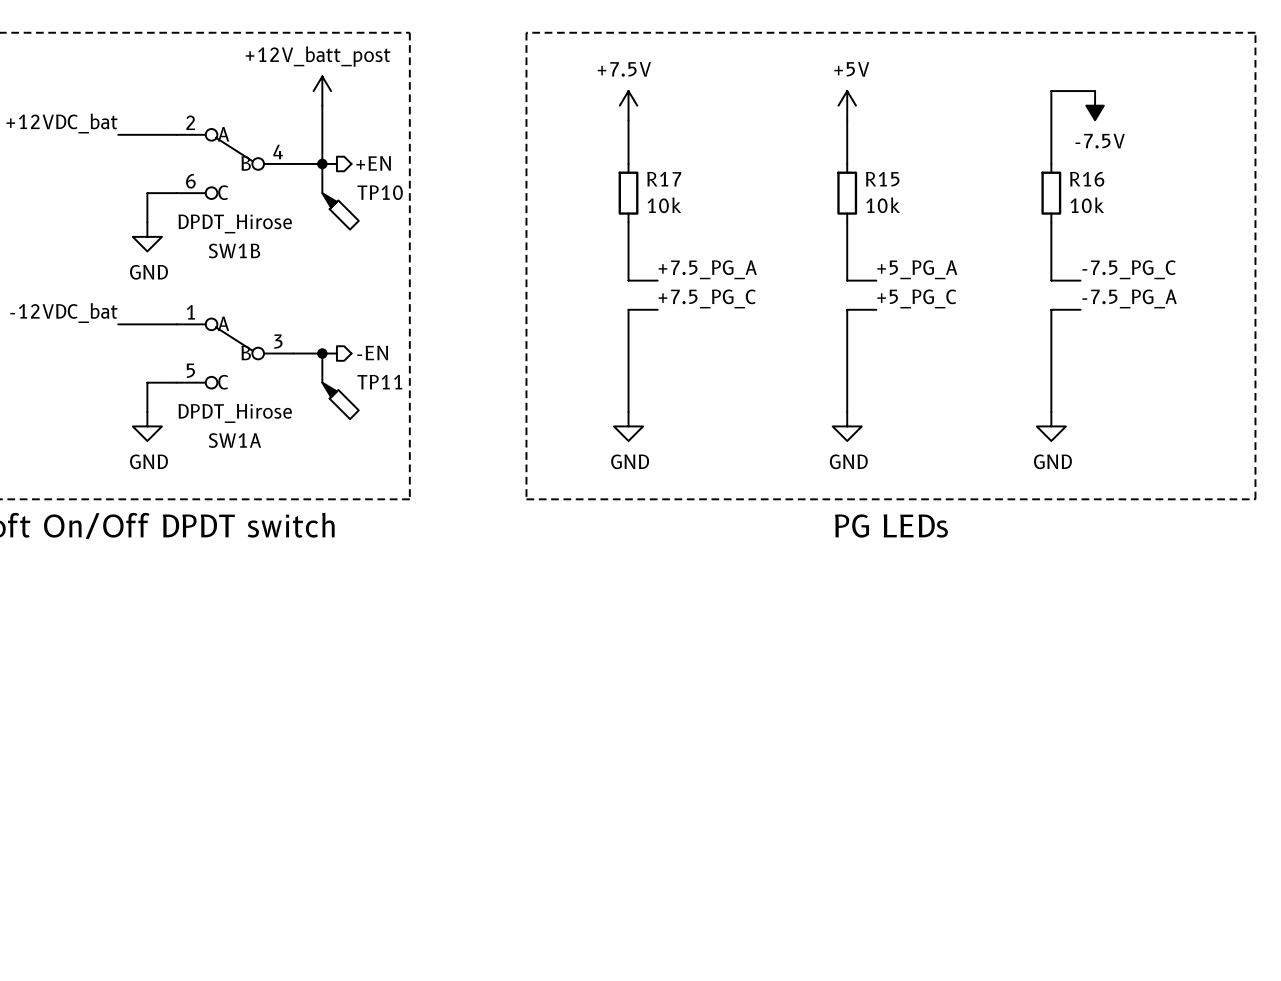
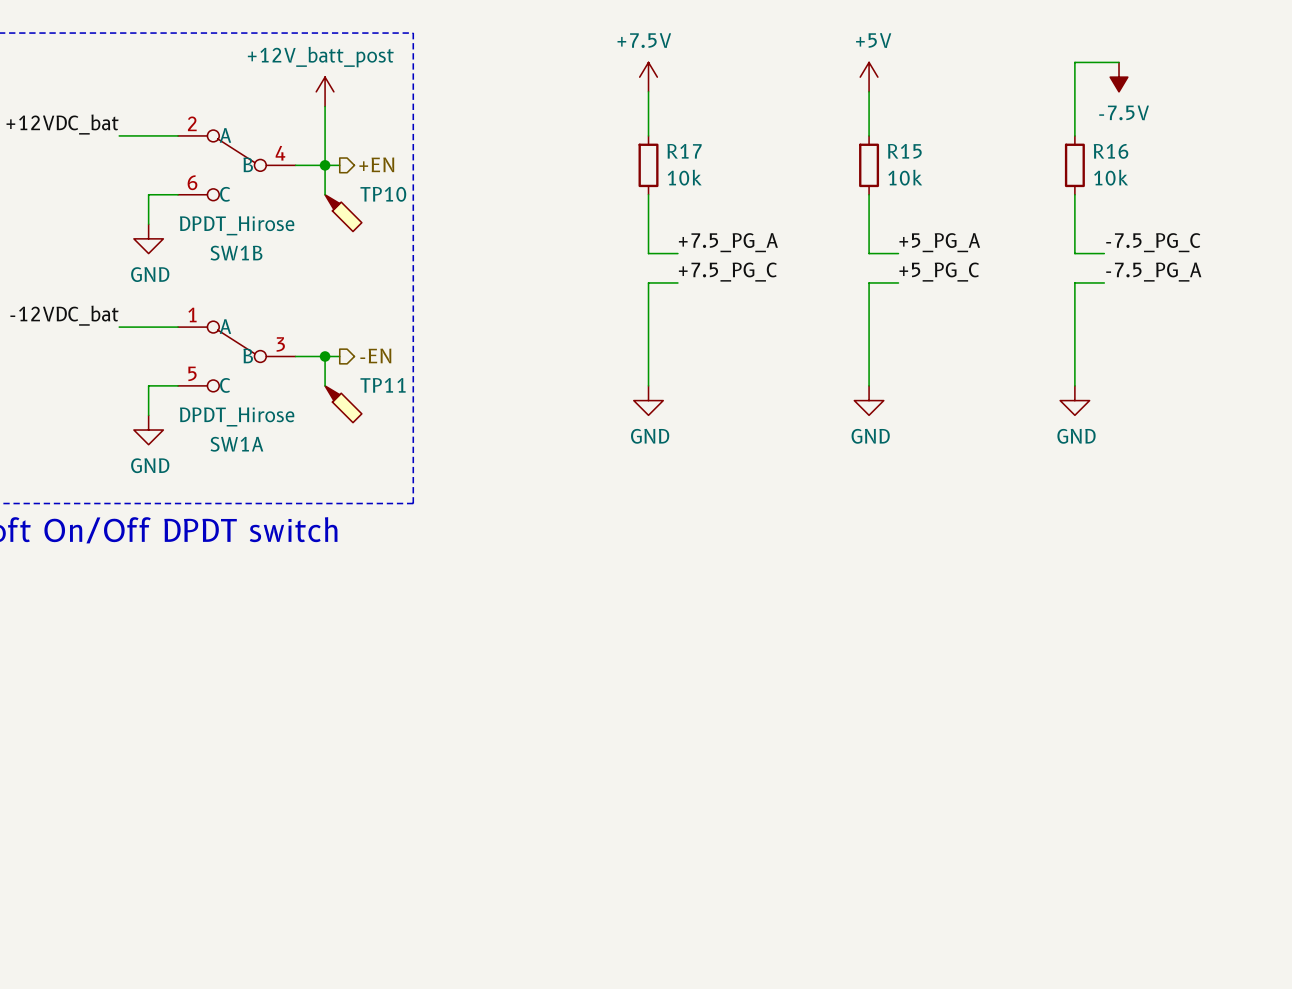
line: (526, 32) (526, 499) (1255, 499) (1255, 32) (526, 32) -> none
wire: (1095, 91) (1051, 91) (1051, 163) -> (1119, 62) (1074, 62) (1074, 135)
power symbol position: +7.5V (628, 105) -> +7.5V (648, 77)
power symbol position: +5V (847, 105) -> +5V (869, 77)
power symbol position: -7.5V (1095, 105) -> -7.5V (1119, 77)
wire: (628, 120) (628, 163) -> (648, 91) (648, 135)
wire: (847, 120) (847, 163) -> (869, 91) (869, 135)
R17 position: (628, 193) -> (648, 165)
wire: none -> (648, 194) (648, 253) (677, 253)
R15 position: (847, 193) -> (869, 165)
wire: none -> (869, 194) (869, 253) (898, 253)
R16 position: (1051, 193) -> (1074, 165)
wire: none -> (1074, 194) (1074, 253) (1104, 253)
wire: (628, 222) (628, 280) (643, 280) -> (648, 385) (648, 282)
wire: (847, 222) (847, 280) (861, 280) -> (869, 385) (869, 282)
wire: (1051, 222) (1051, 280) (1065, 280) -> (1074, 385) (1074, 282)
label position: +7.5_PG_A (707, 269) -> +7.5_PG_A (728, 242)
label position: +5_PG_A (917, 269) -> +5_PG_A (939, 242)
label position: -7.5_PG_C (1129, 269) -> -7.5_PG_C (1153, 242)
wire: none -> (663, 282) (677, 282)
wire: none -> (883, 282) (898, 282)
wire: none -> (1089, 282) (1104, 282)
label position: +7.5_PG_C (707, 298) -> +7.5_PG_C (727, 272)
label position: +5_PG_C (916, 298) -> +5_PG_C (939, 272)
label position: -7.5_PG_A (1129, 298) -> -7.5_PG_A (1153, 272)
wire: (657, 309) (628, 309) (628, 411) -> none
wire: (876, 309) (847, 309) (847, 411) -> none
wire: (1080, 309) (1051, 309) (1051, 411) -> none
power symbol position: GND (628, 426) -> GND (648, 400)
power symbol position: GND (847, 426) -> GND (869, 400)
power symbol position: GND (1051, 426) -> GND (1074, 400)
text: PG LEDs (891, 525) -> none

